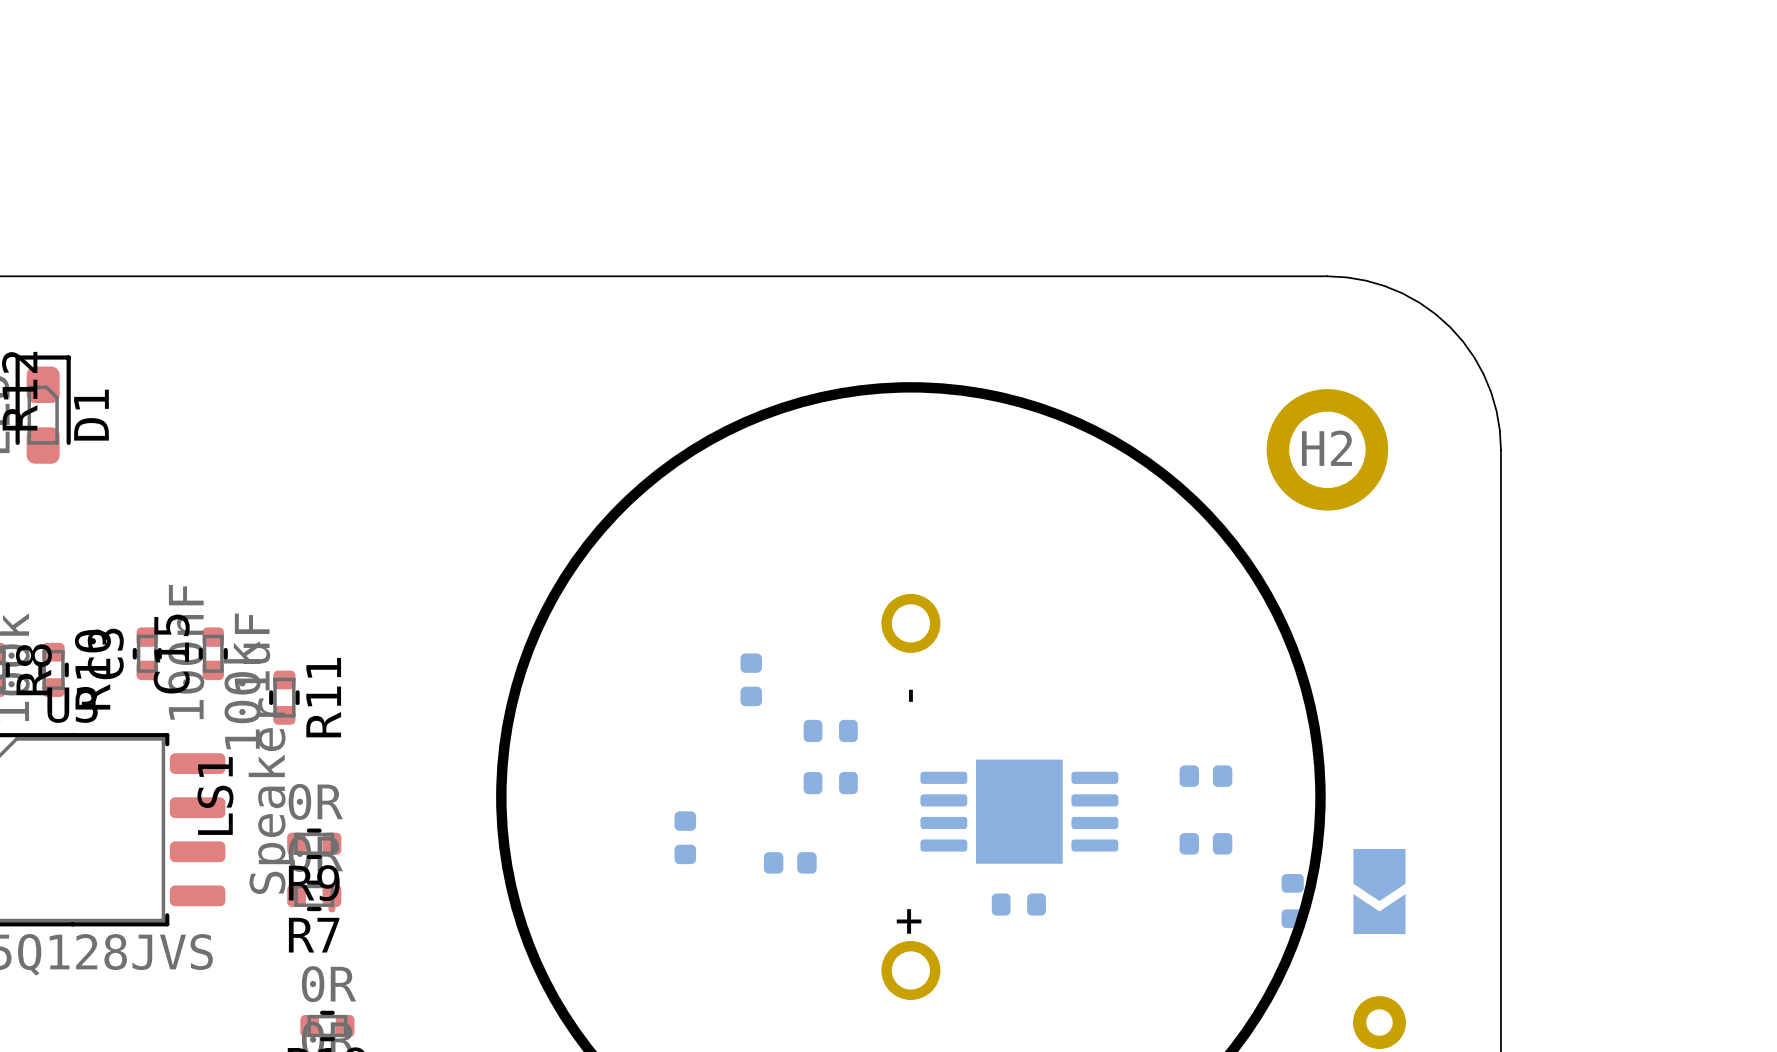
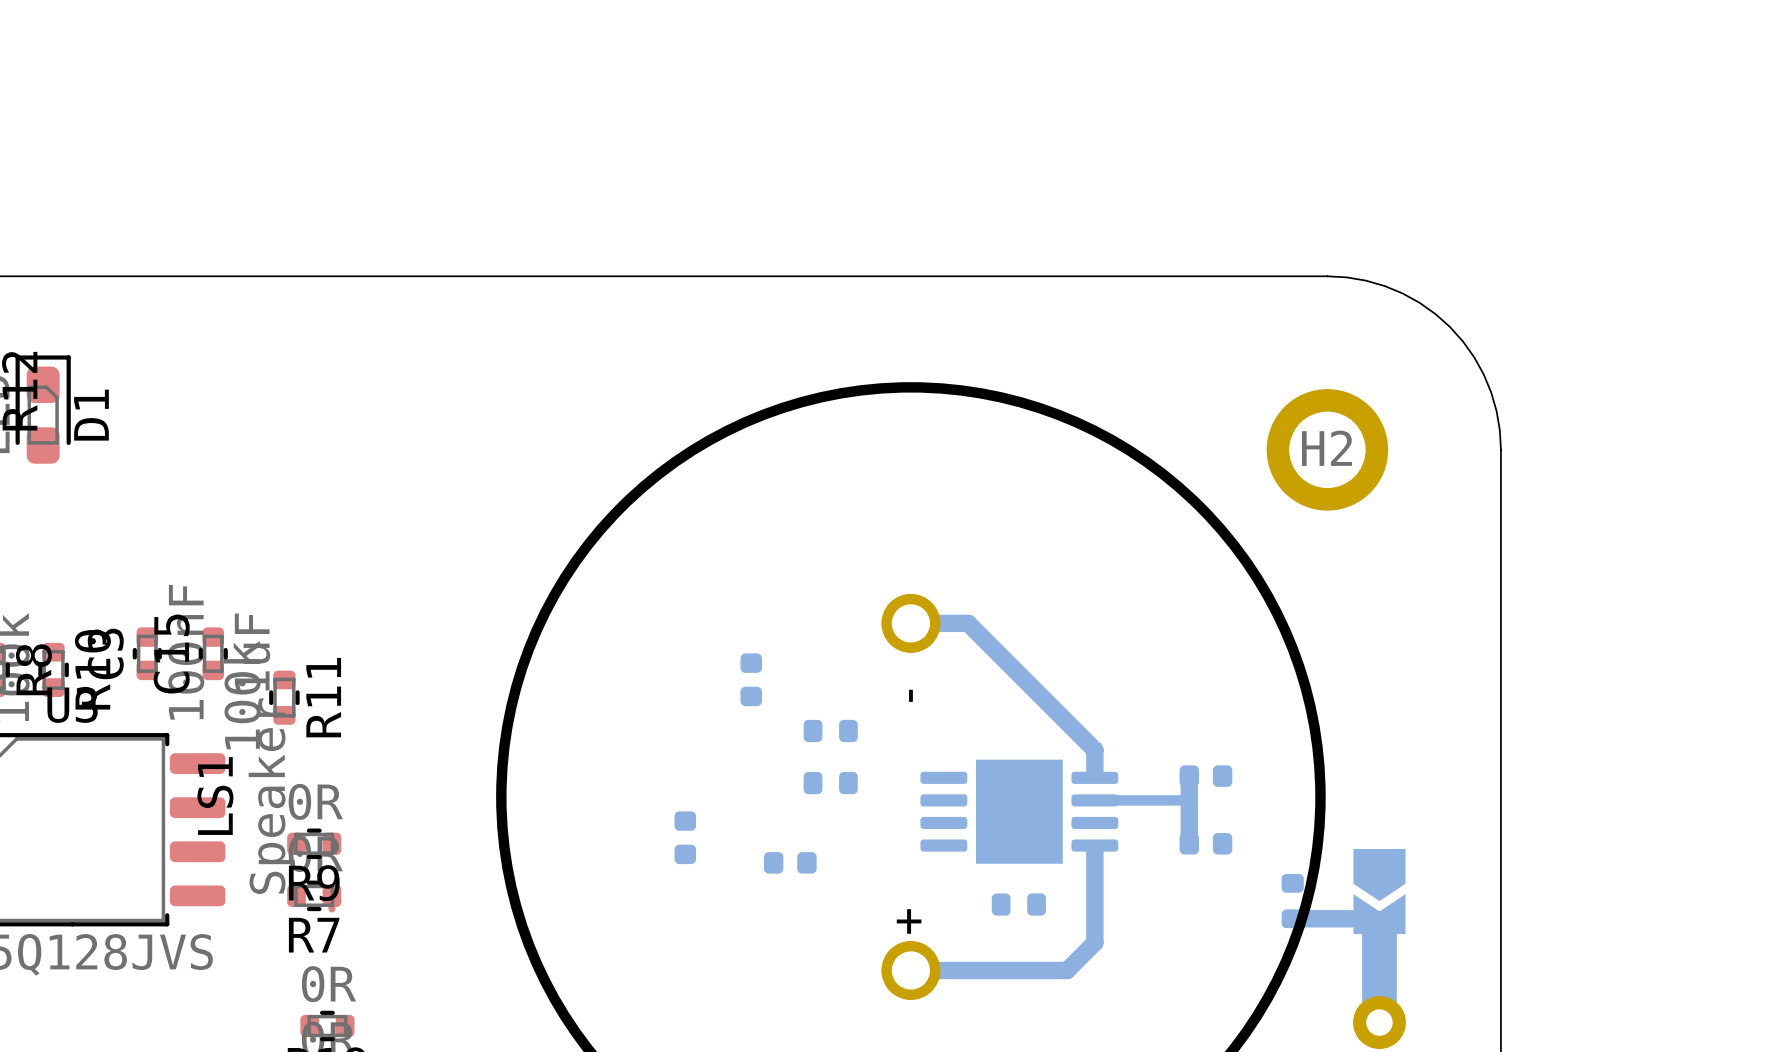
bottom track: none -> (910, 623) (968, 623) (1094, 750) (1094, 774)
bottom track: none -> (1189, 776) (1188, 843)
bottom track: none -> (1094, 800) (1189, 800)
bottom track: none -> (1094, 849) (1094, 942) (1067, 970) (910, 970)
bottom track: none -> (1292, 918) (1374, 920)
bottom track: none -> (1379, 928) (1379, 1022)

